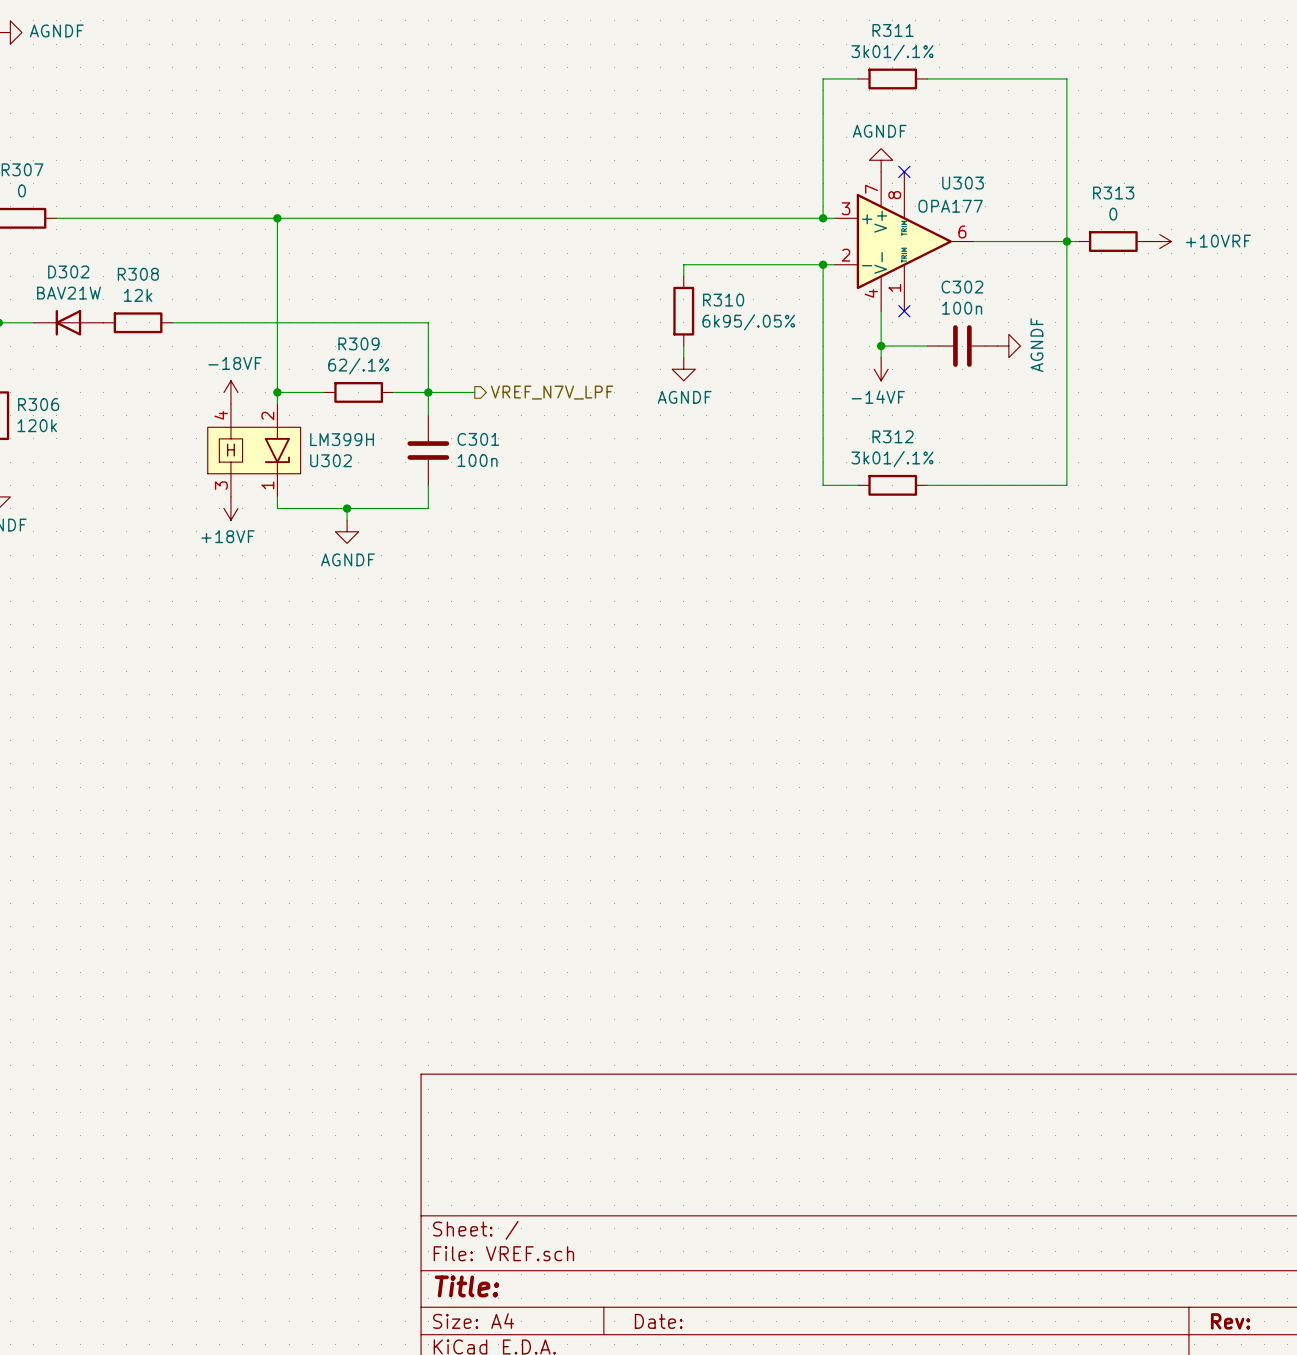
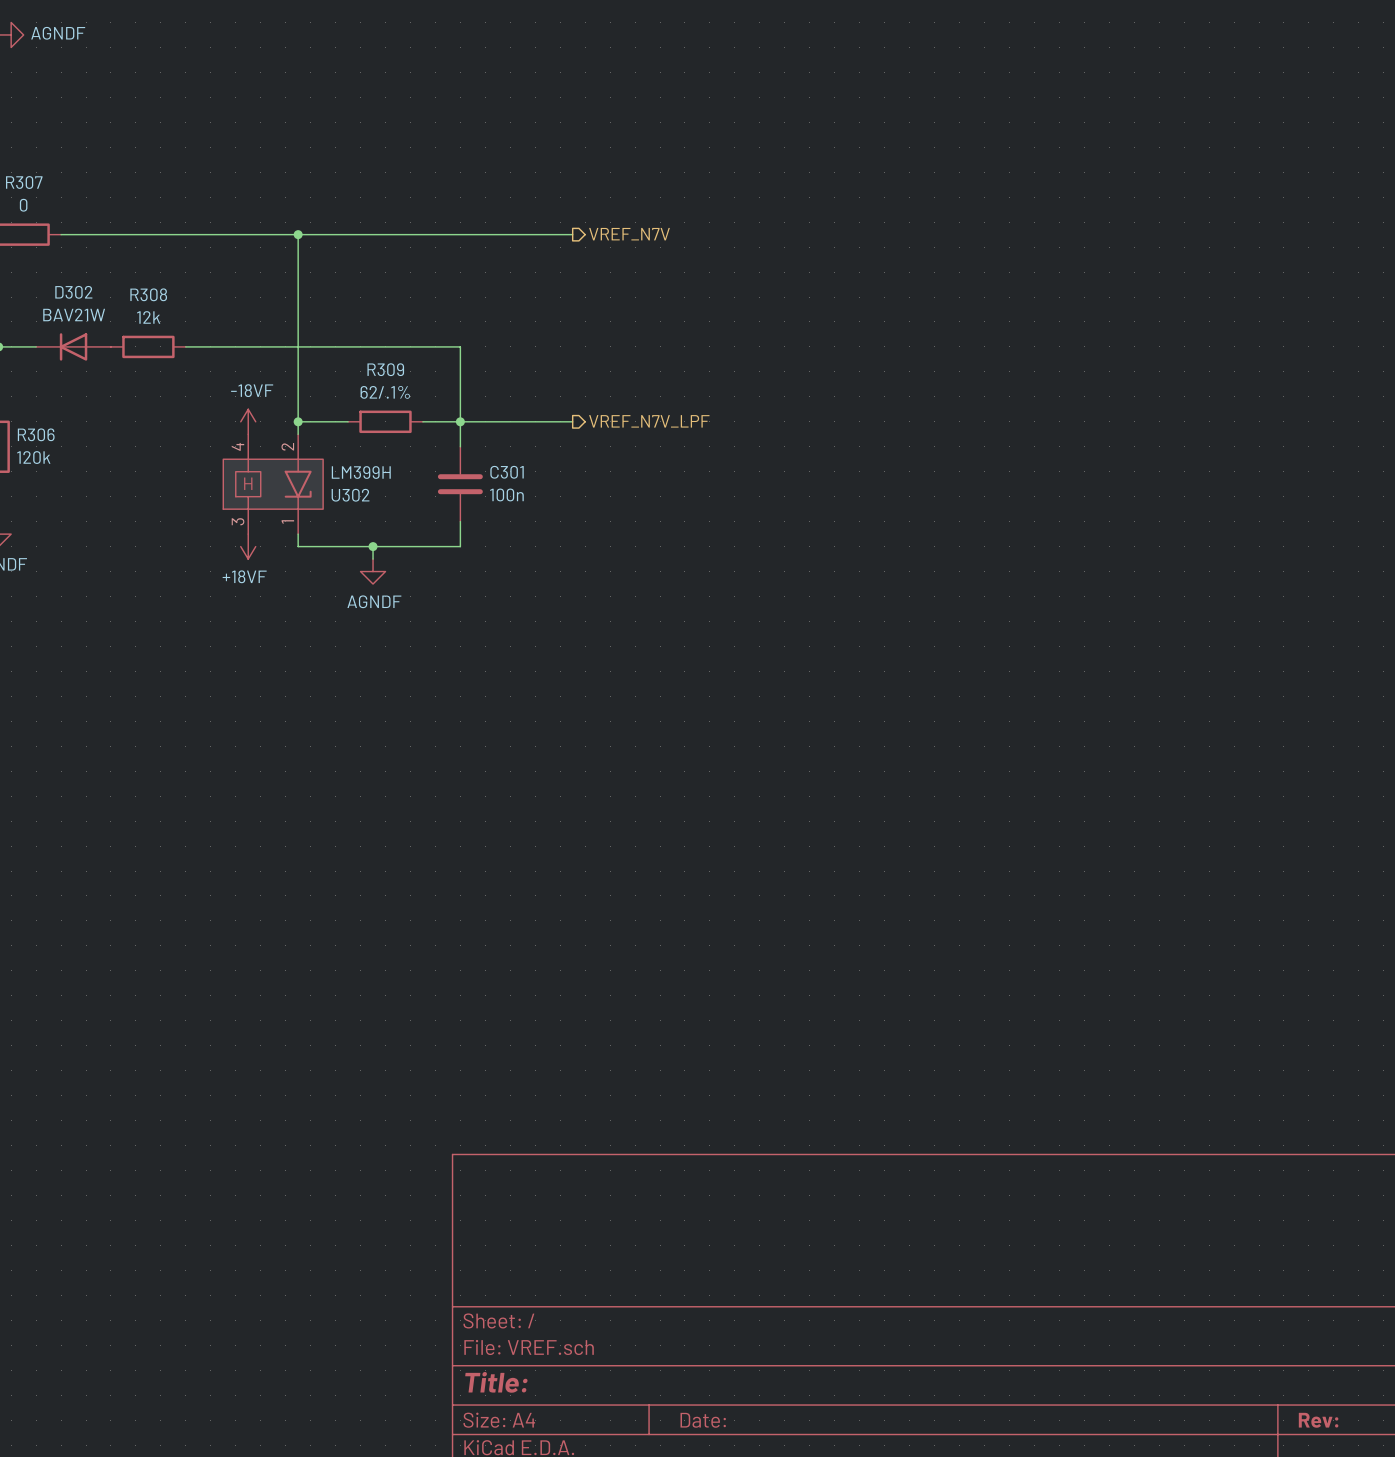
wire: (857, 78) (823, 78) (823, 218) -> none
R311: 3k01/.1% (892, 78) -> none
wire: (927, 78) (1066, 78) (1066, 485) (927, 485) -> none
power symbol: AGNDF (881, 160) -> none
no-connect mark: (904, 171) -> none
wire: (532, 218) (834, 218) -> none
hierarchical label: none -> VREF_N7V (629, 234)
junction: (823, 218) -> none
U303: OPA177 (904, 241) -> none
wire: (974, 241) (1078, 241) -> none
junction: (1066, 241) -> none
R313: 0 (1113, 241) -> none
power symbol: +10VRF (1159, 241) -> none
wire: (823, 264) (823, 485) (857, 485) -> none
junction: (823, 264) -> none
wire: (834, 264) (683, 264) (683, 276) -> none
R310: 6k95/.05% (683, 311) -> none
wire: (881, 311) (881, 357) -> none
no-connect mark: (904, 311) -> none
wire: (683, 346) (683, 357) -> none
wire: (881, 346) (927, 346) -> none
junction: (881, 346) -> none
C302: 100n (962, 346) -> none
power symbol: AGNDF (1008, 346) -> none
power symbol: AGNDF (683, 369) -> none
power symbol: -14VF (881, 369) -> none
wire: none -> (510, 421) (572, 421)
hierarchical label position: VREF_N7V_LPF (552, 392) -> VREF_N7V_LPF (649, 421)
R312: 3k01/.1% (892, 485) -> none

